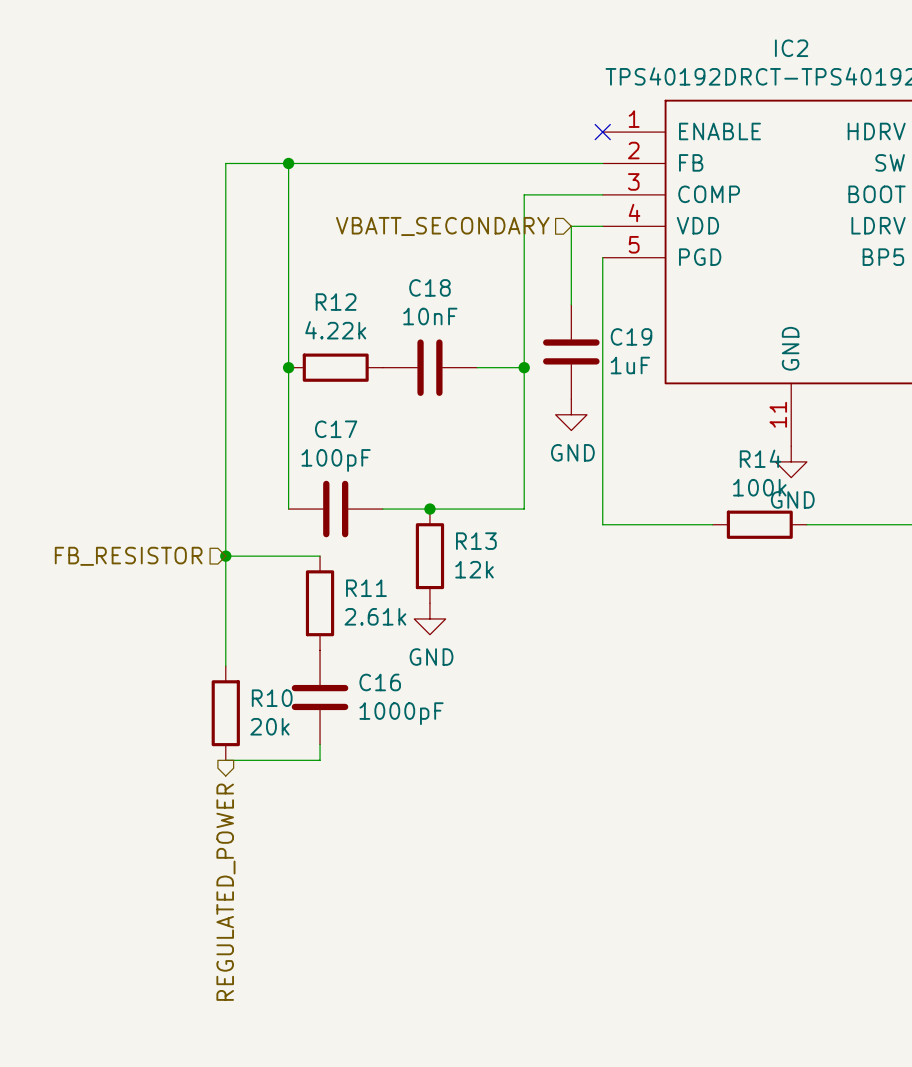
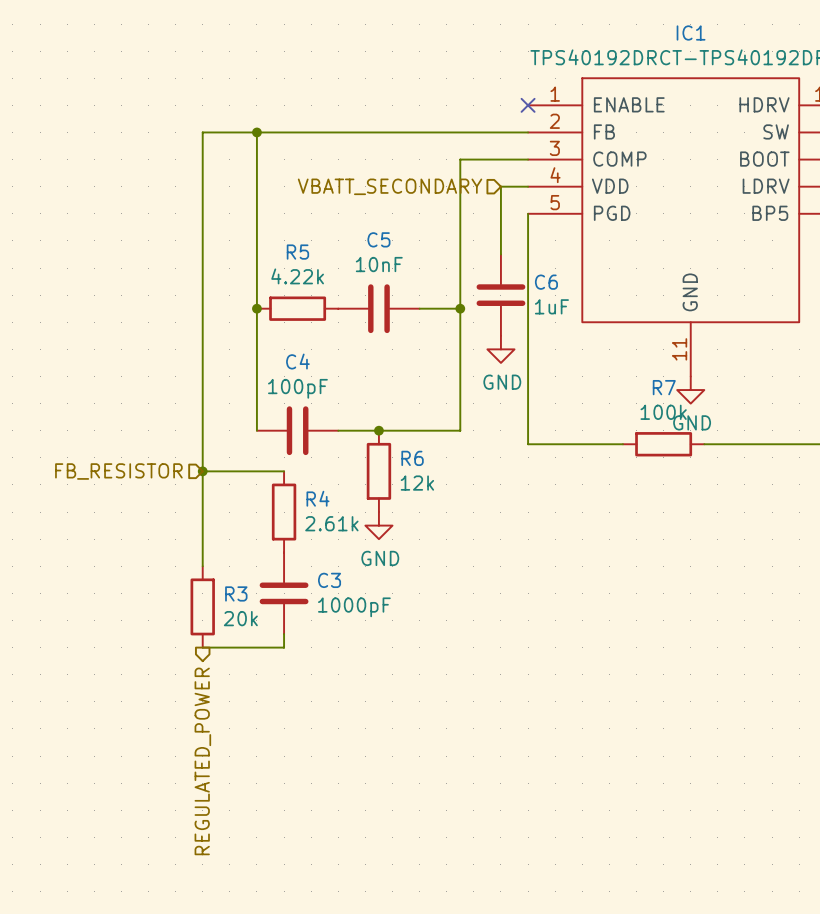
IC2 name: IC2 (791, 48) -> IC1 (691, 32)
C18 name: C18 (429, 287) -> C5 (378, 239)
R12 name: R12 (336, 302) -> R5 (297, 252)
C19 name: C19 (631, 336) -> C6 (546, 282)
C17 name: C17 (336, 429) -> C4 (297, 361)
R14 name: R14 (760, 458) -> R7 (664, 387)
R13 name: R13 (476, 541) -> R6 (412, 458)
R11 name: R11 (366, 588) -> R4 (317, 498)
C16 name: C16 (380, 682) -> C3 (329, 580)
R10 name: R10 (272, 698) -> R3 (236, 593)

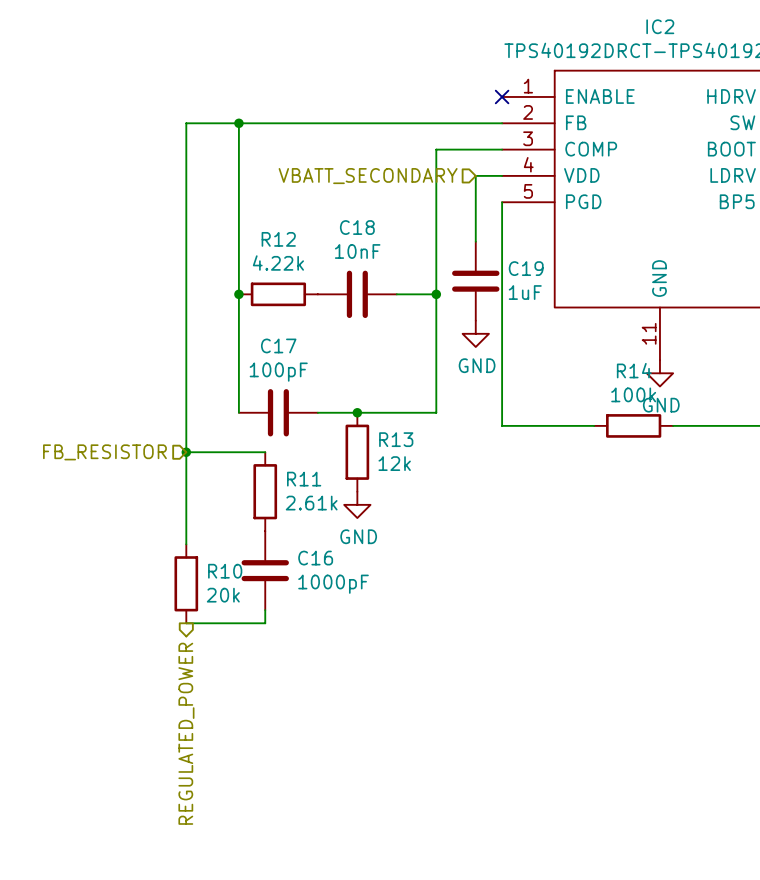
IC1 name: IC1 (691, 32) -> IC2 (660, 26)
C5 name: C5 (378, 239) -> C18 (357, 227)
R5 name: R5 (297, 252) -> R12 (278, 239)
C6 name: C6 (546, 282) -> C19 (526, 268)
C4 name: C4 (297, 361) -> C17 (278, 345)
R7 name: R7 (664, 387) -> R14 (634, 370)
R6 name: R6 (412, 458) -> R13 (396, 439)
R4 name: R4 (317, 498) -> R11 (304, 479)
C3 name: C3 (329, 580) -> C16 (315, 558)
R3 name: R3 (236, 593) -> R10 (225, 571)

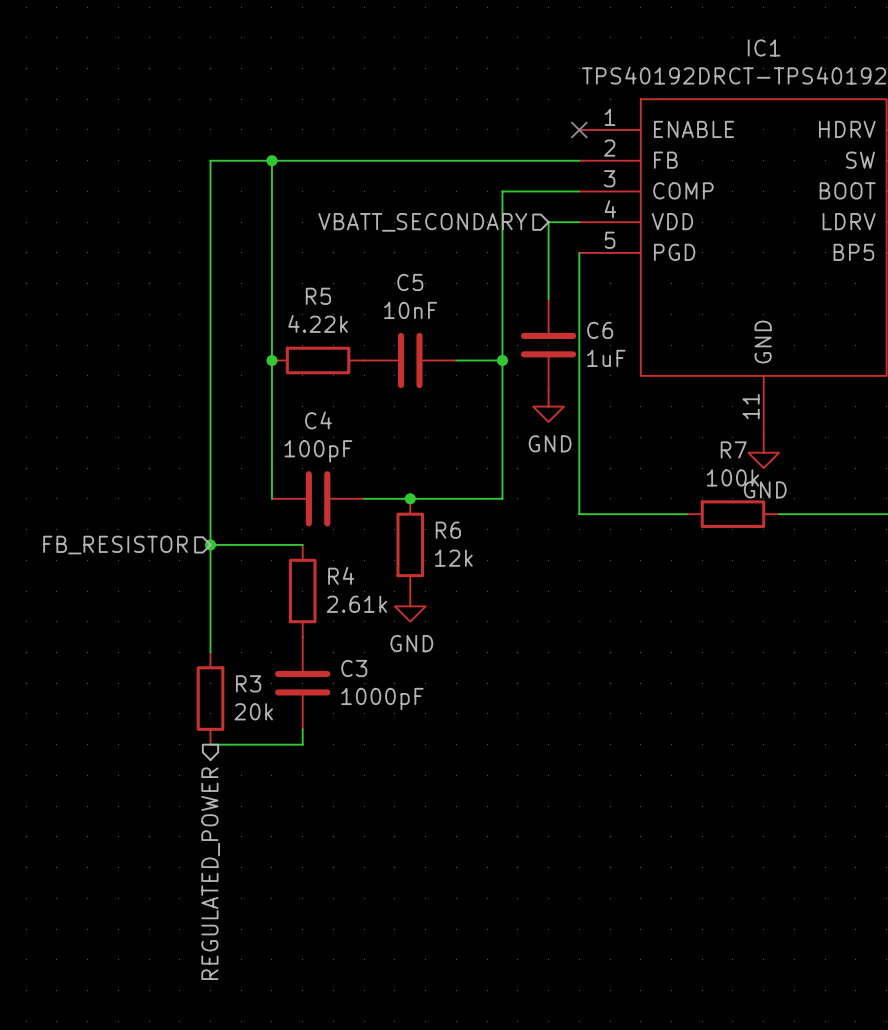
IC2 name: IC2 (660, 26) -> IC1 (764, 47)
C18 name: C18 (357, 227) -> C5 (410, 282)
R12 name: R12 (278, 239) -> R5 (318, 296)
C19 name: C19 (526, 268) -> C6 (600, 330)
C17 name: C17 (278, 345) -> C4 (318, 420)
R14 name: R14 (634, 370) -> R7 (733, 449)
R13 name: R13 (396, 439) -> R6 (448, 530)
R11 name: R11 (304, 479) -> R4 (341, 575)
C16 name: C16 (315, 558) -> C3 (354, 668)
R10 name: R10 (225, 571) -> R3 (248, 683)

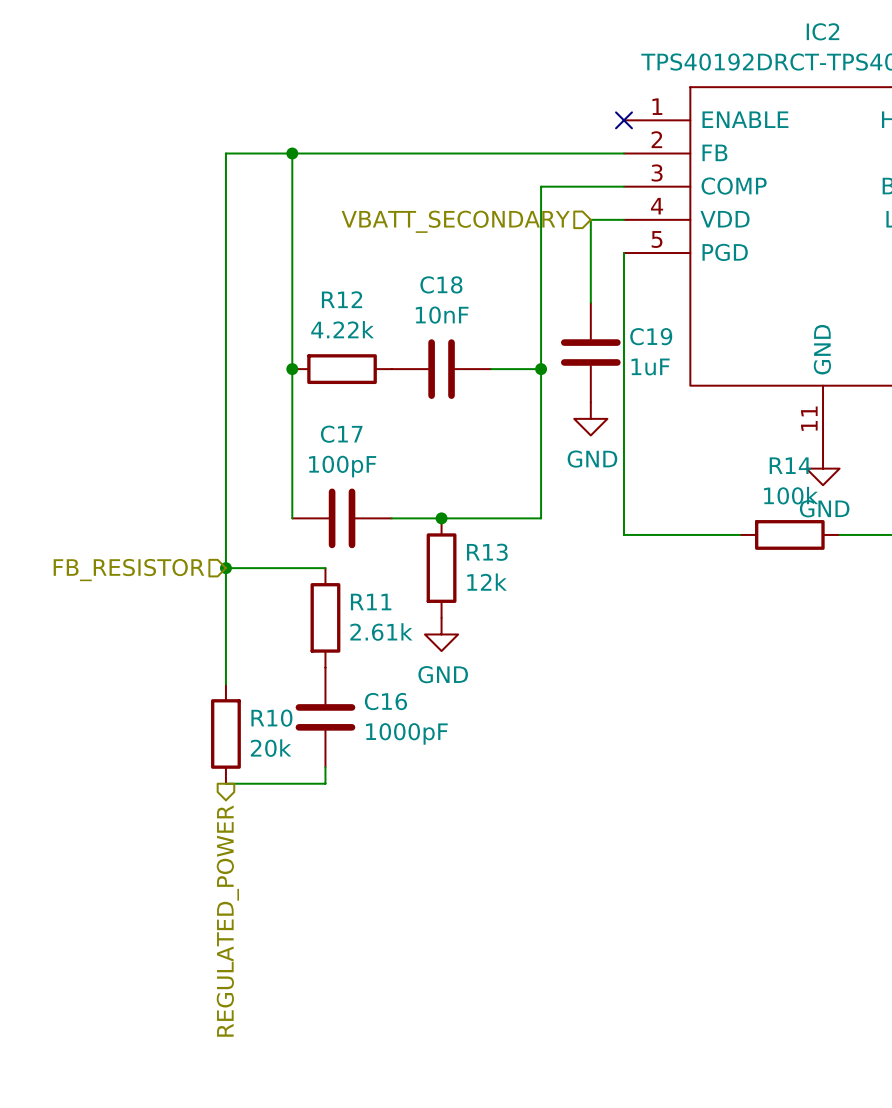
IC1 name: IC1 (764, 47) -> IC2 (822, 31)
C5 name: C5 (410, 282) -> C18 (441, 284)
R5 name: R5 (318, 296) -> R12 (342, 299)
C6 name: C6 (600, 330) -> C19 (651, 336)
C4 name: C4 (318, 420) -> C17 (341, 434)
R7 name: R7 (733, 449) -> R14 (790, 465)
R6 name: R6 (448, 530) -> R13 (487, 552)
R4 name: R4 (341, 575) -> R11 (371, 602)
C3 name: C3 (354, 668) -> C16 (385, 701)
R3 name: R3 (248, 683) -> R10 (271, 718)

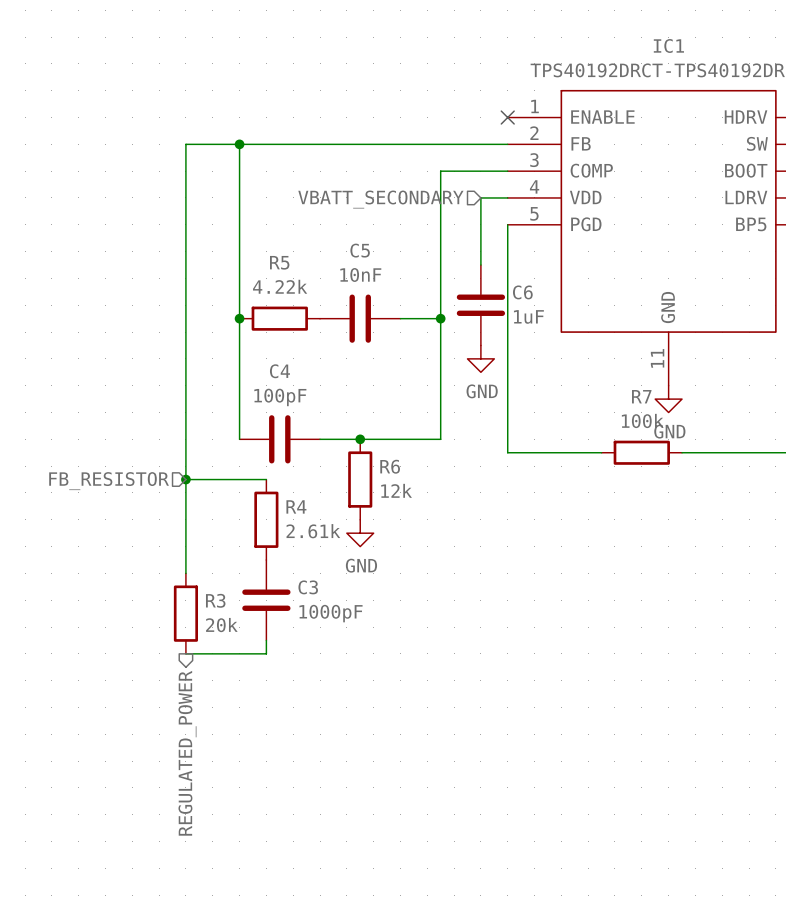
IC2 name: IC2 (822, 31) -> IC1 (668, 45)
C18 name: C18 (441, 284) -> C5 (360, 250)
R12 name: R12 (342, 299) -> R5 (279, 262)
C19 name: C19 (651, 336) -> C6 (522, 292)
C17 name: C17 (341, 434) -> C4 (279, 371)
R14 name: R14 (790, 465) -> R7 (641, 396)
R13 name: R13 (487, 552) -> R6 (390, 466)
R11 name: R11 (371, 602) -> R4 (296, 506)
C16 name: C16 (385, 701) -> C3 (308, 587)
R10 name: R10 (271, 718) -> R3 (215, 600)

